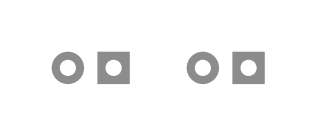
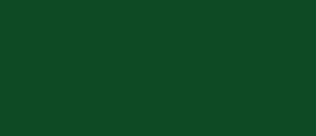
part: (90, 67) -> none
part: (225, 67) -> none

